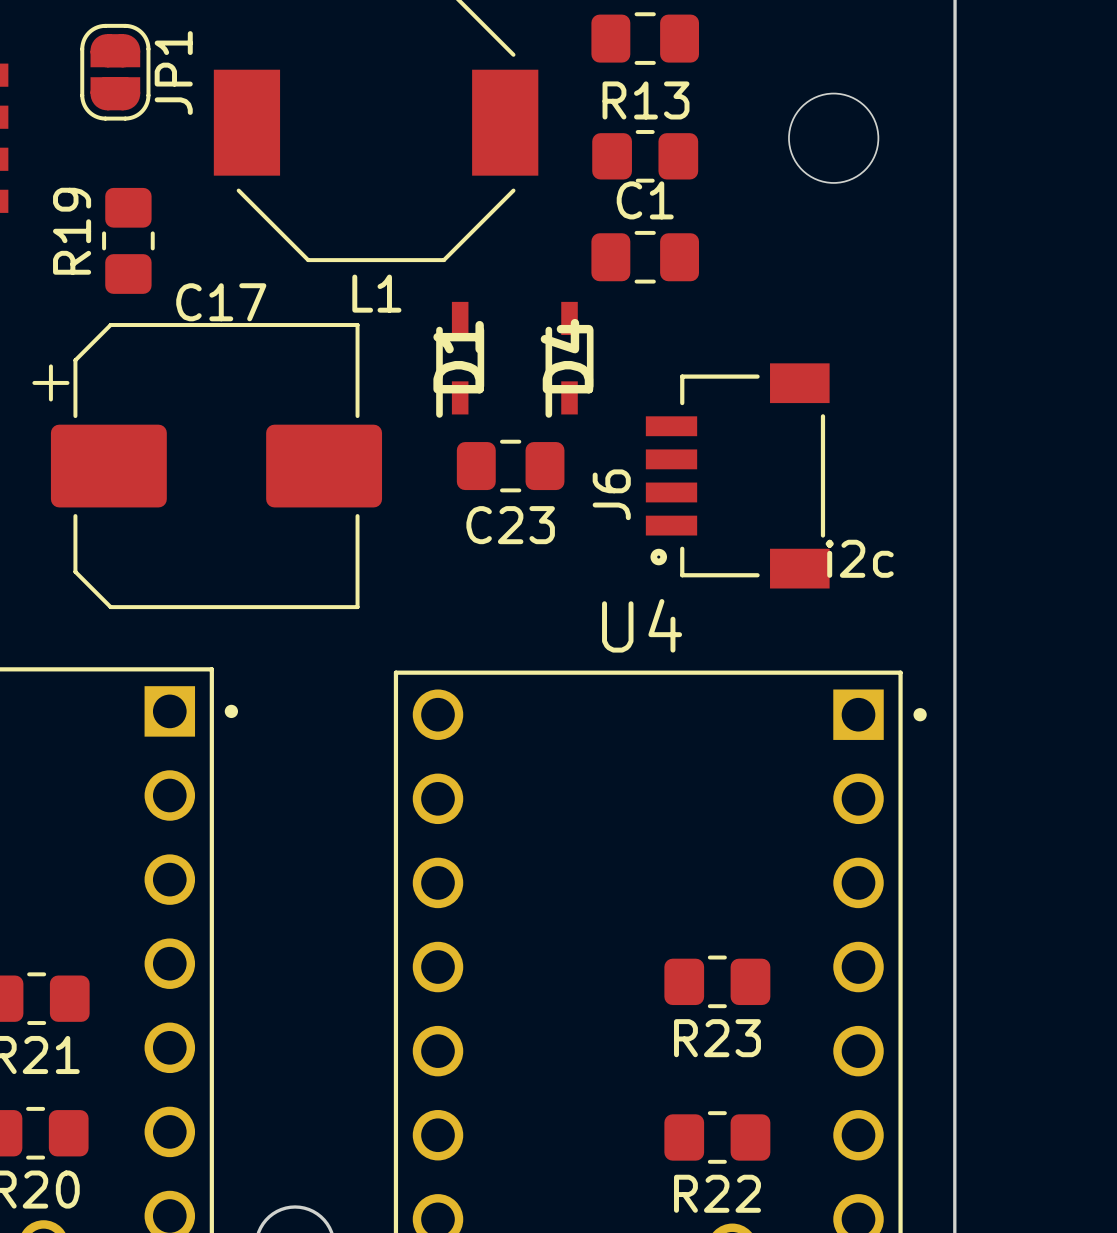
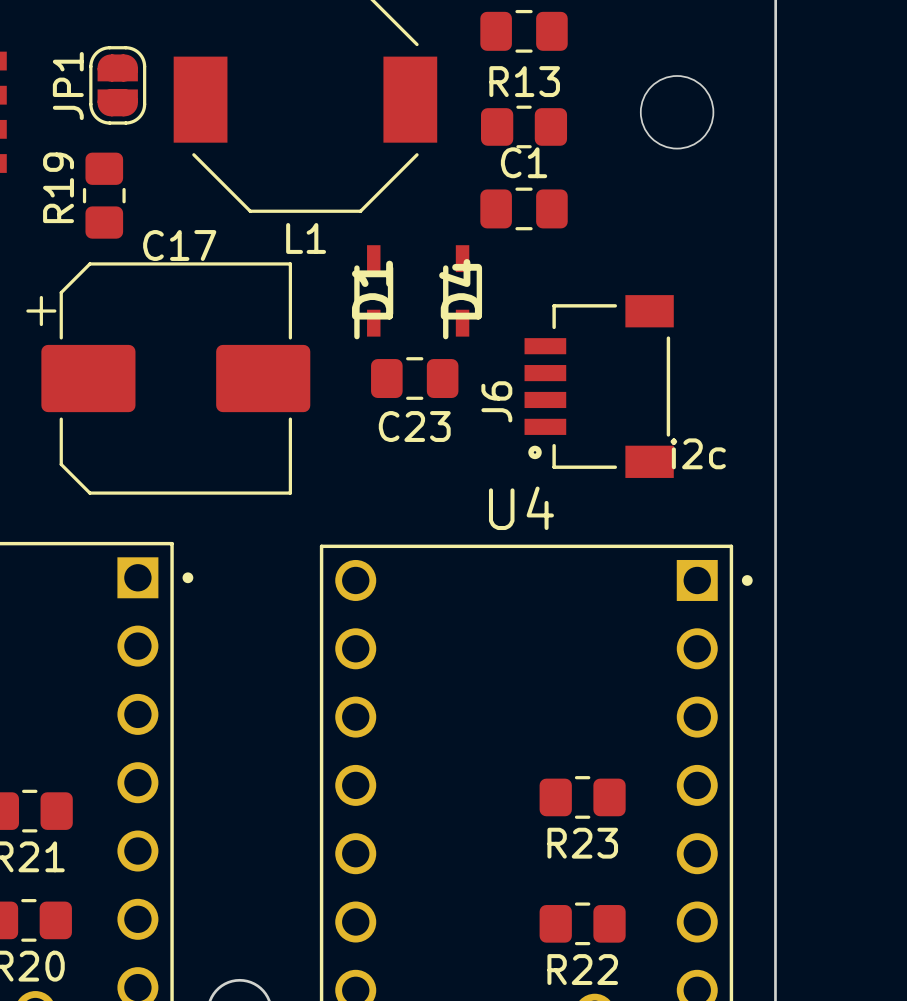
JP1 position: (115, 72) -> (117, 85)
JP1 name position: JP1 (173, 73) -> JP1 (68, 86)

